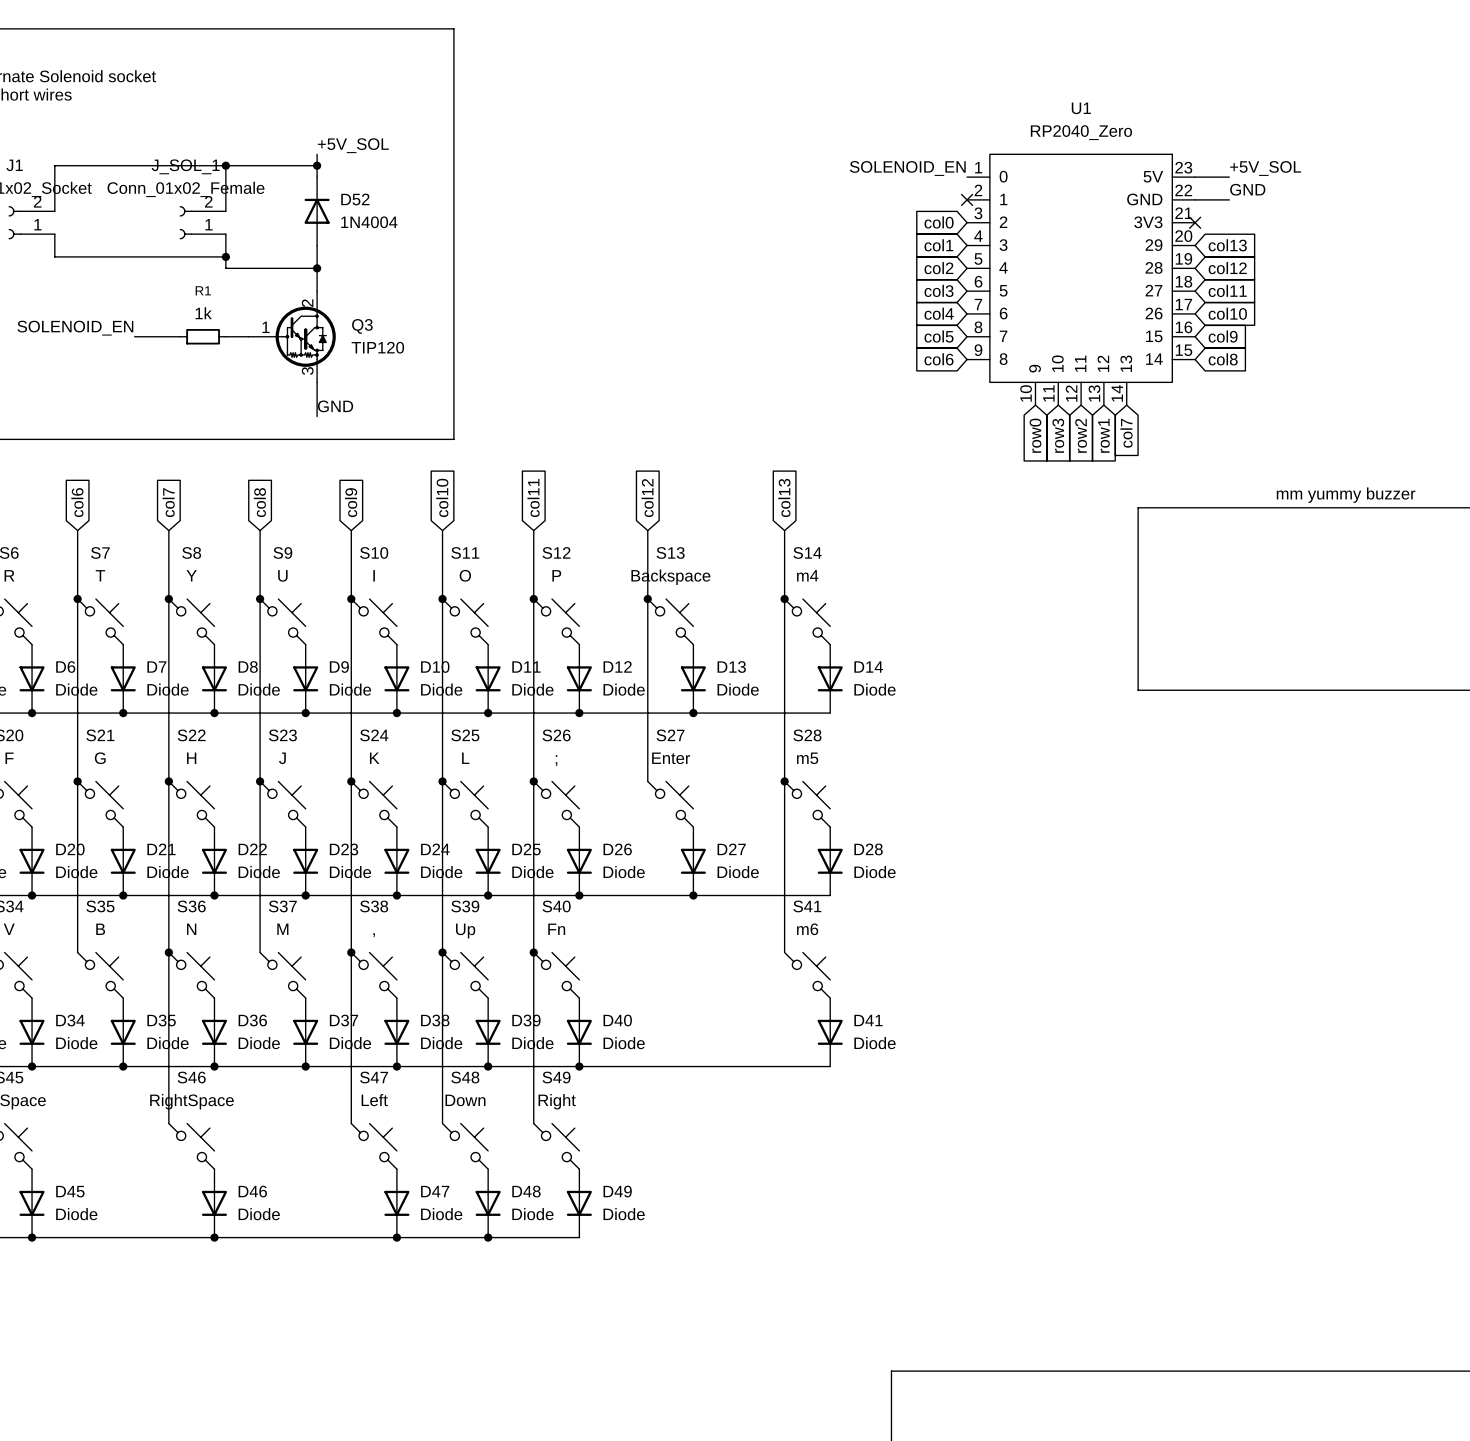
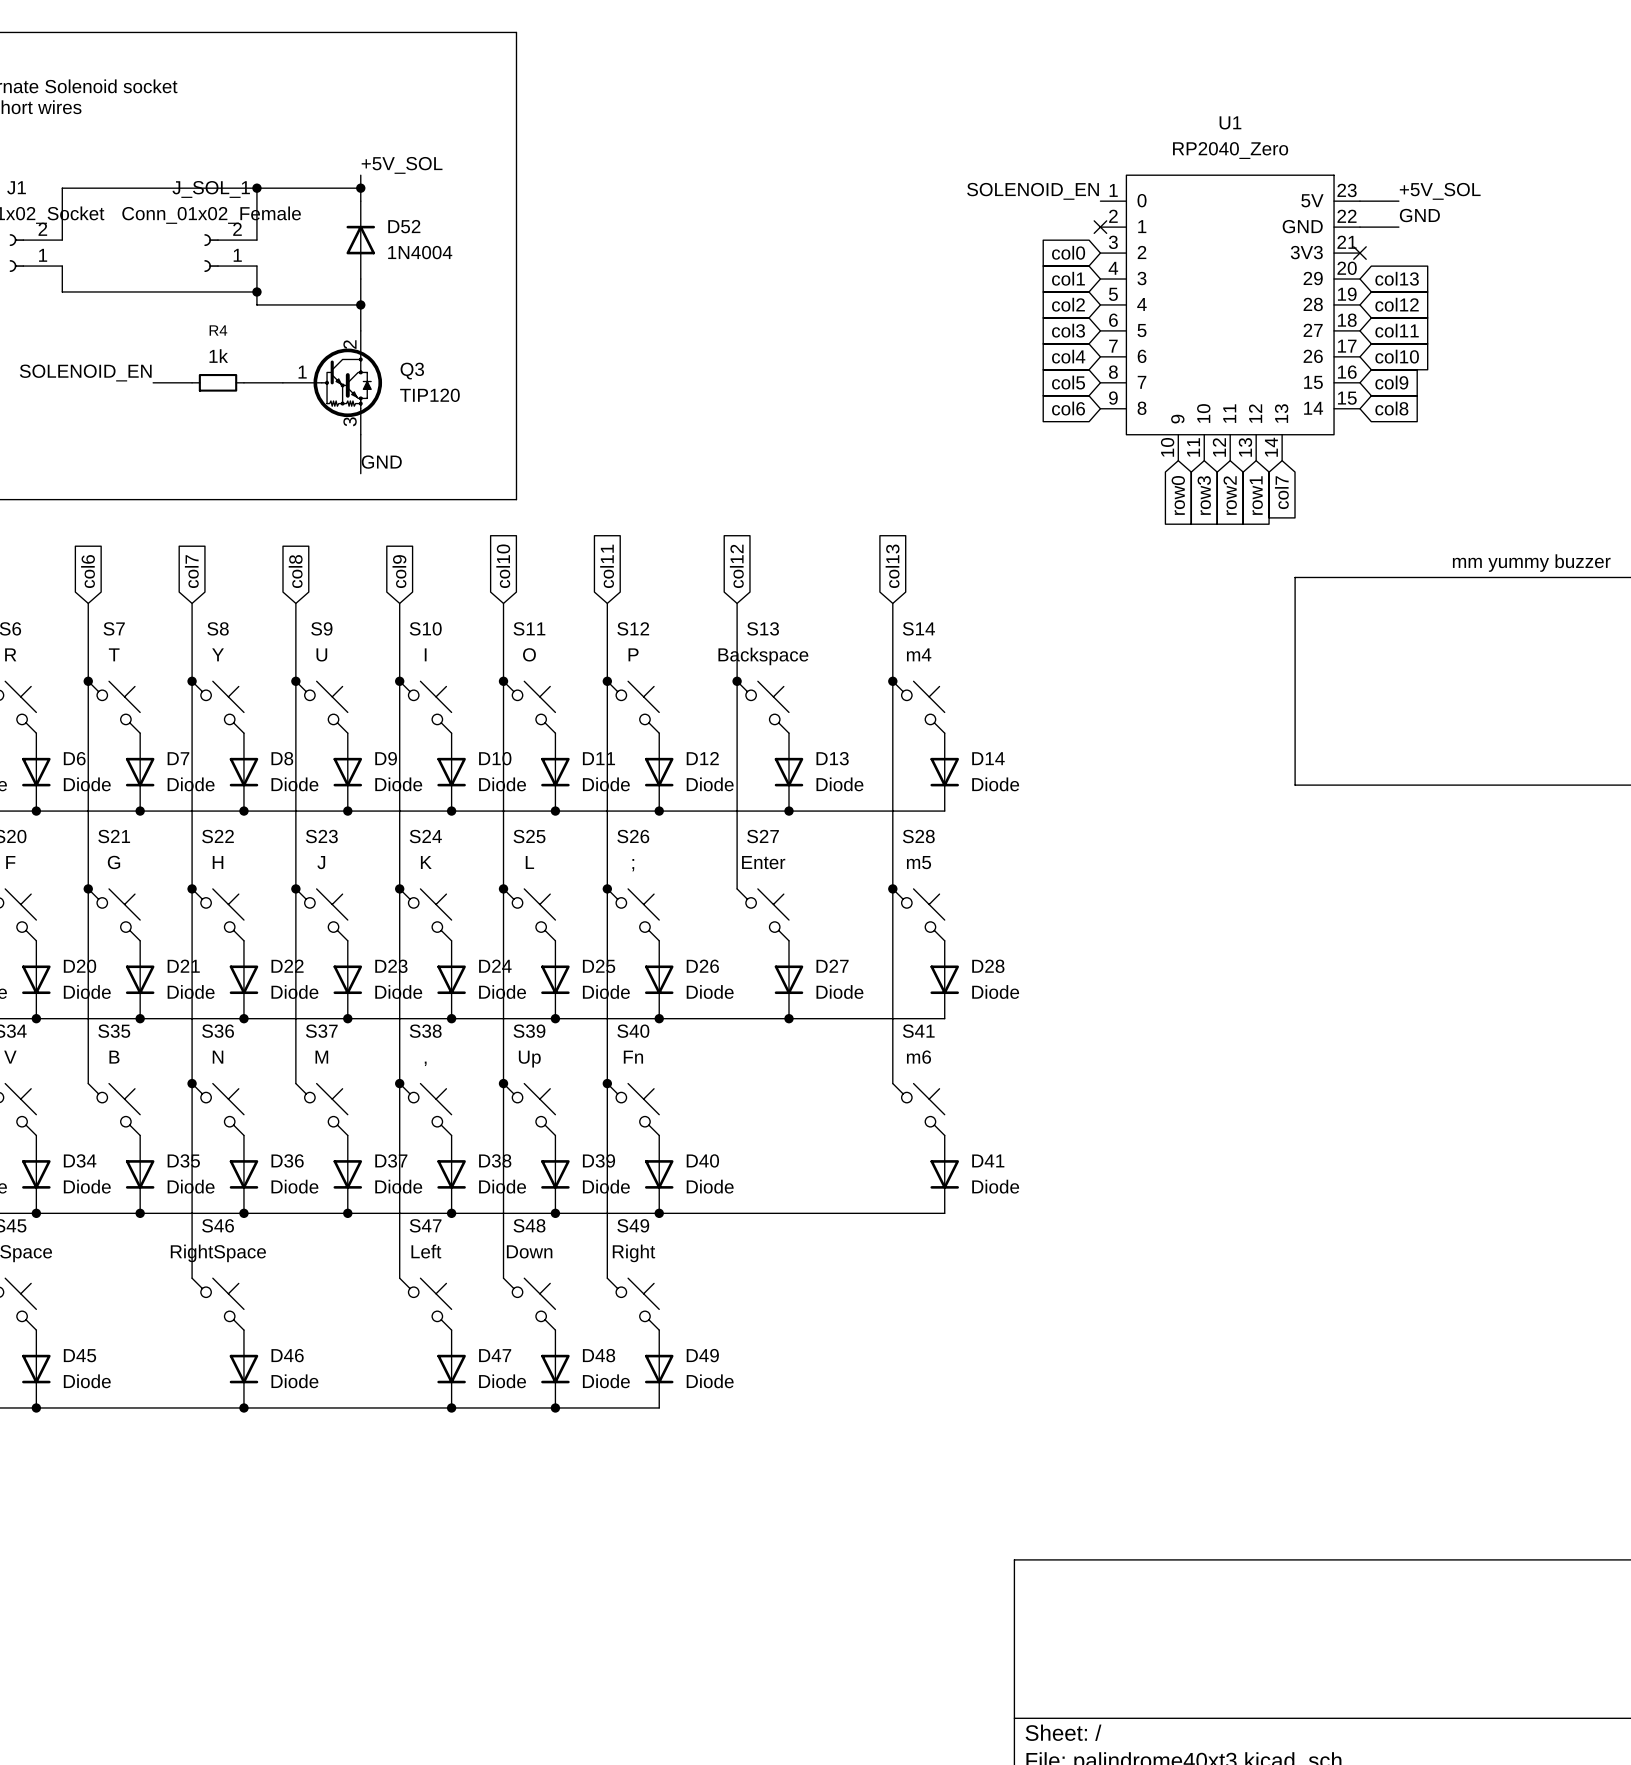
R4: none -> 1k (218, 382)
R1: 1k (203, 336) -> none

